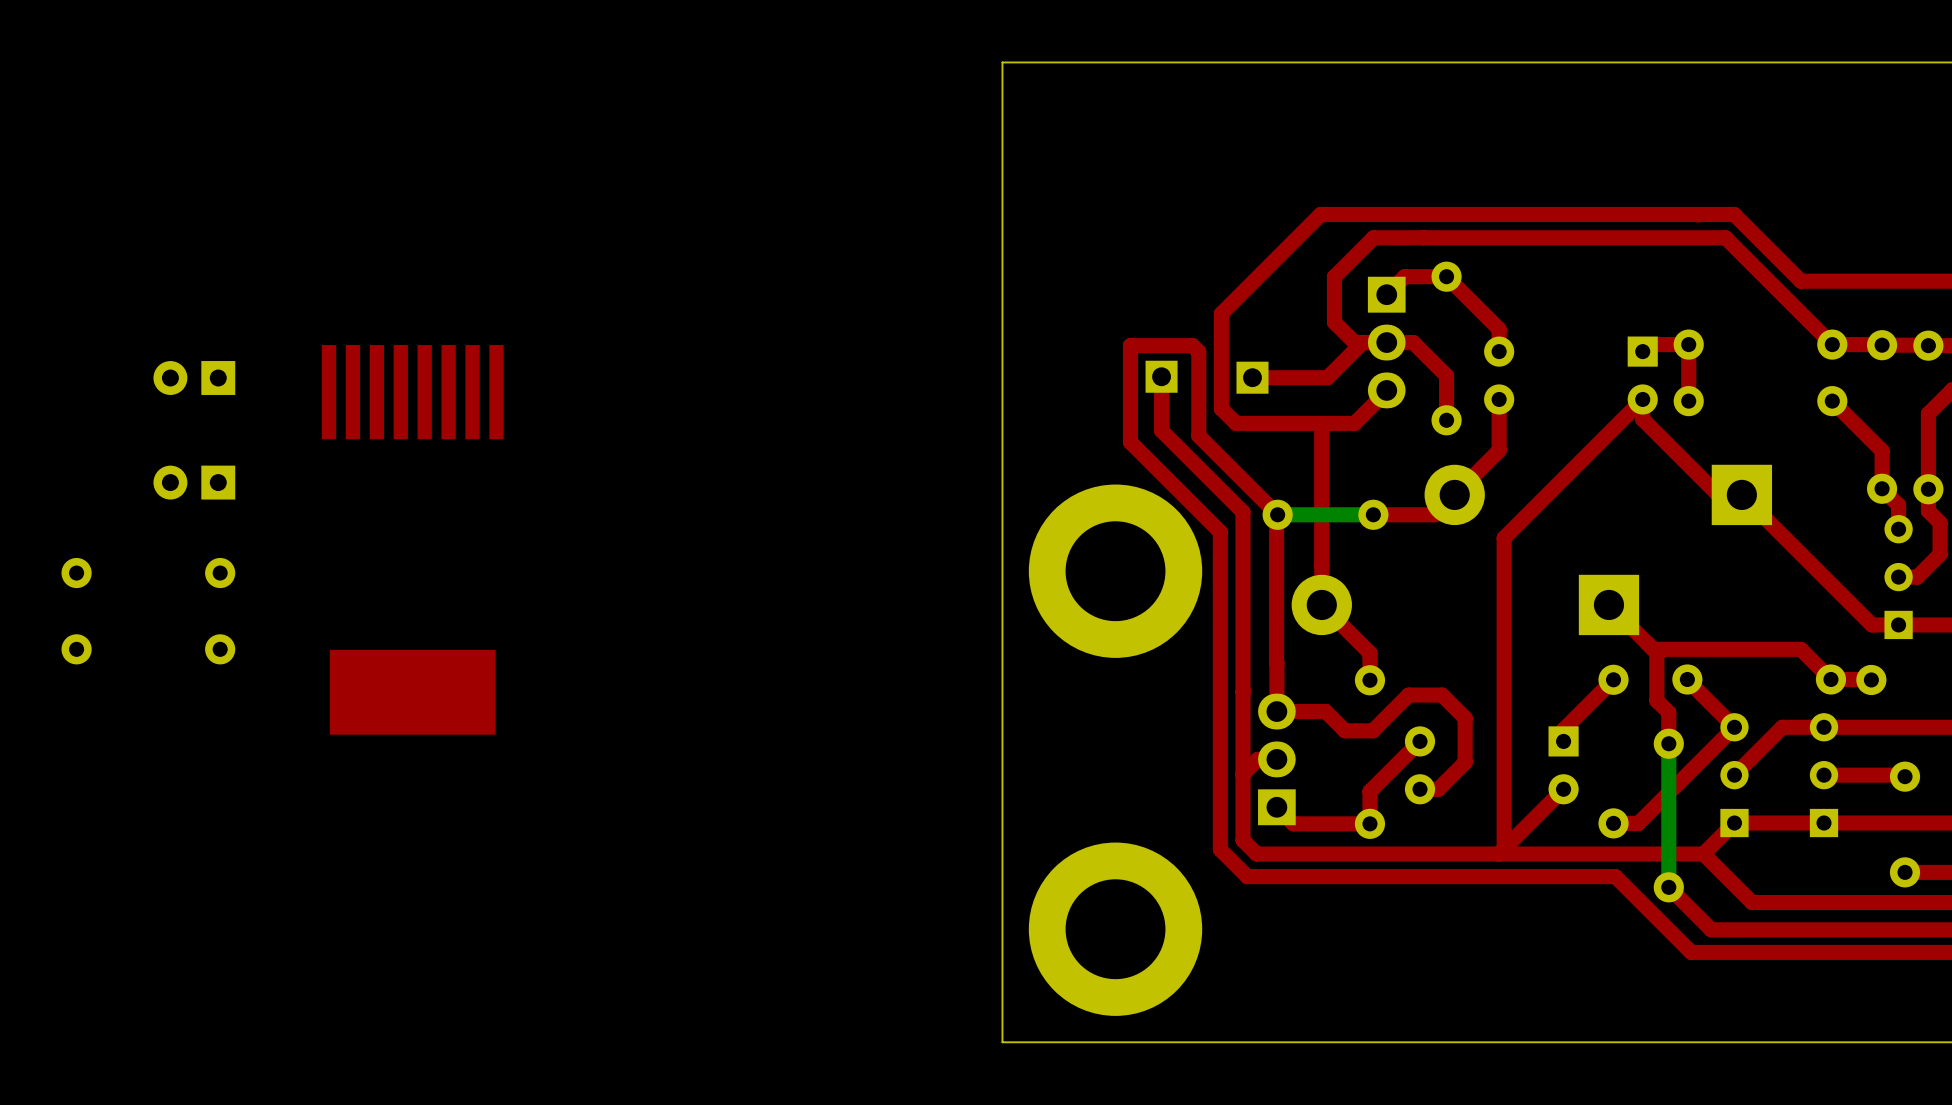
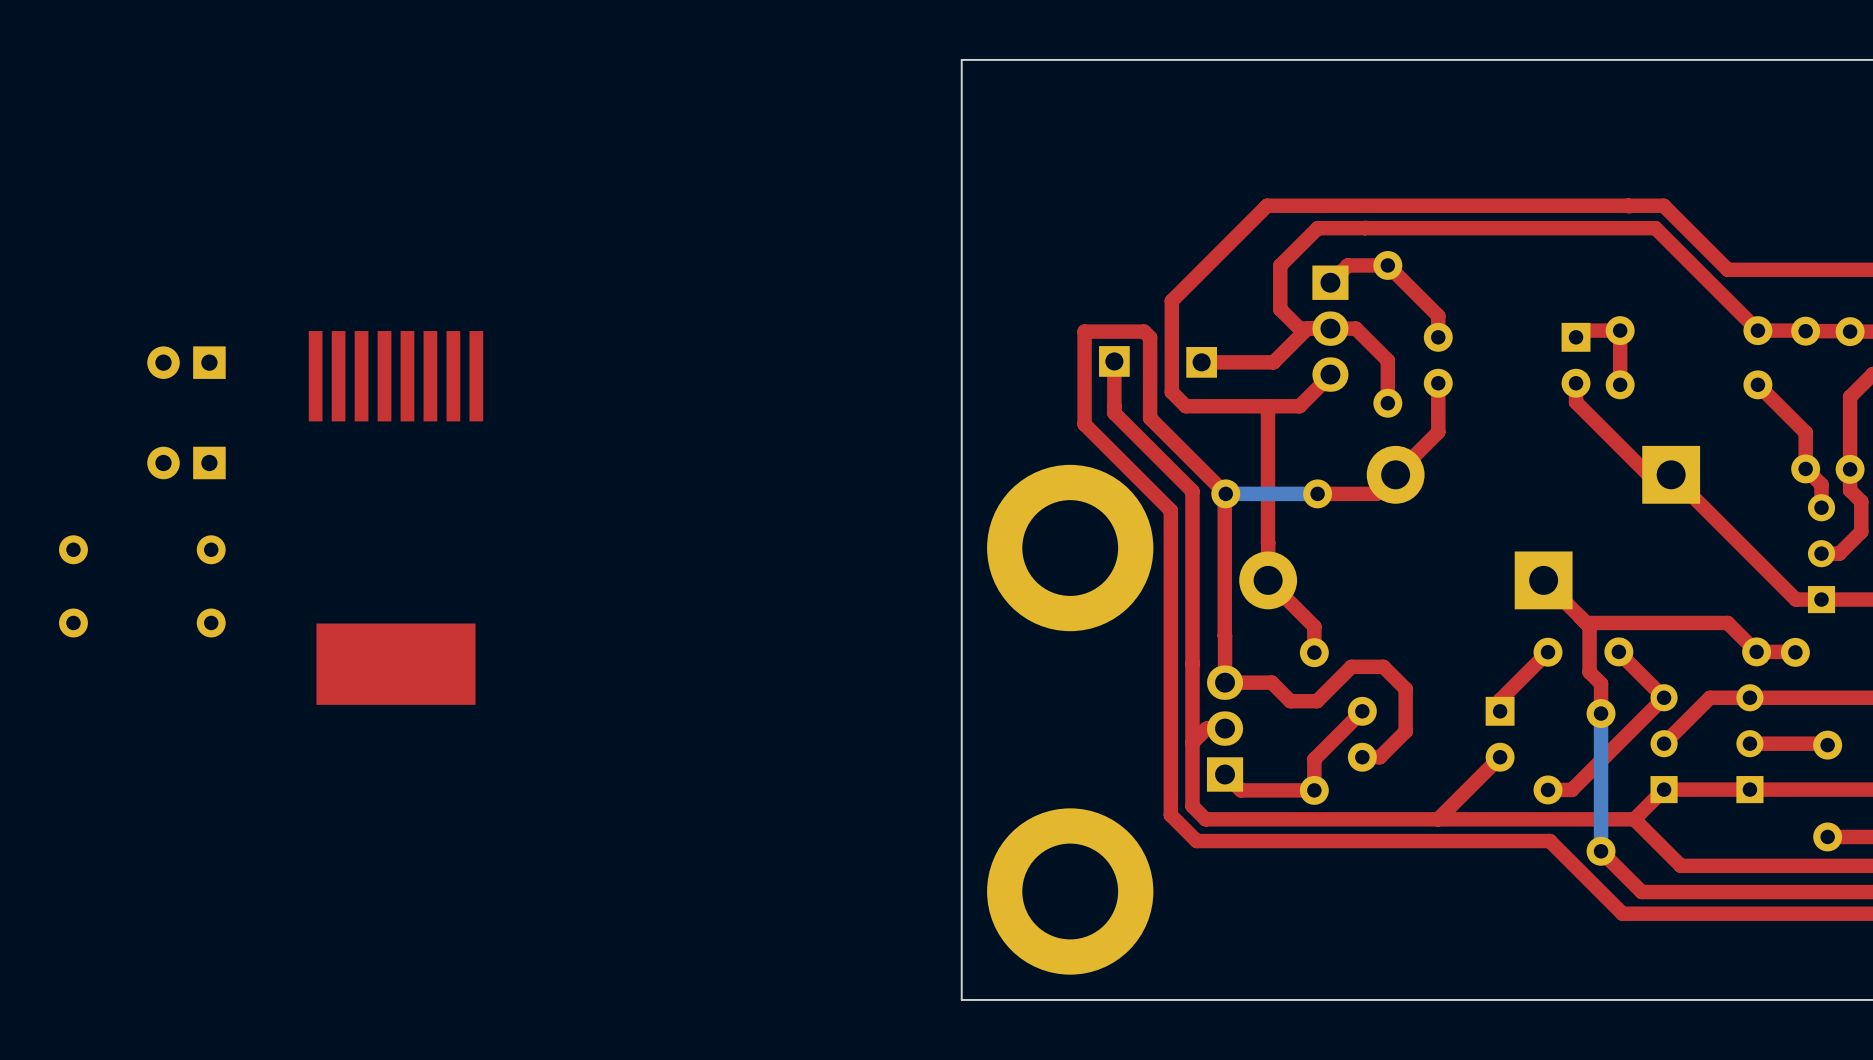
top track: (1642, 399) (1504, 538) (1504, 848) -> none

